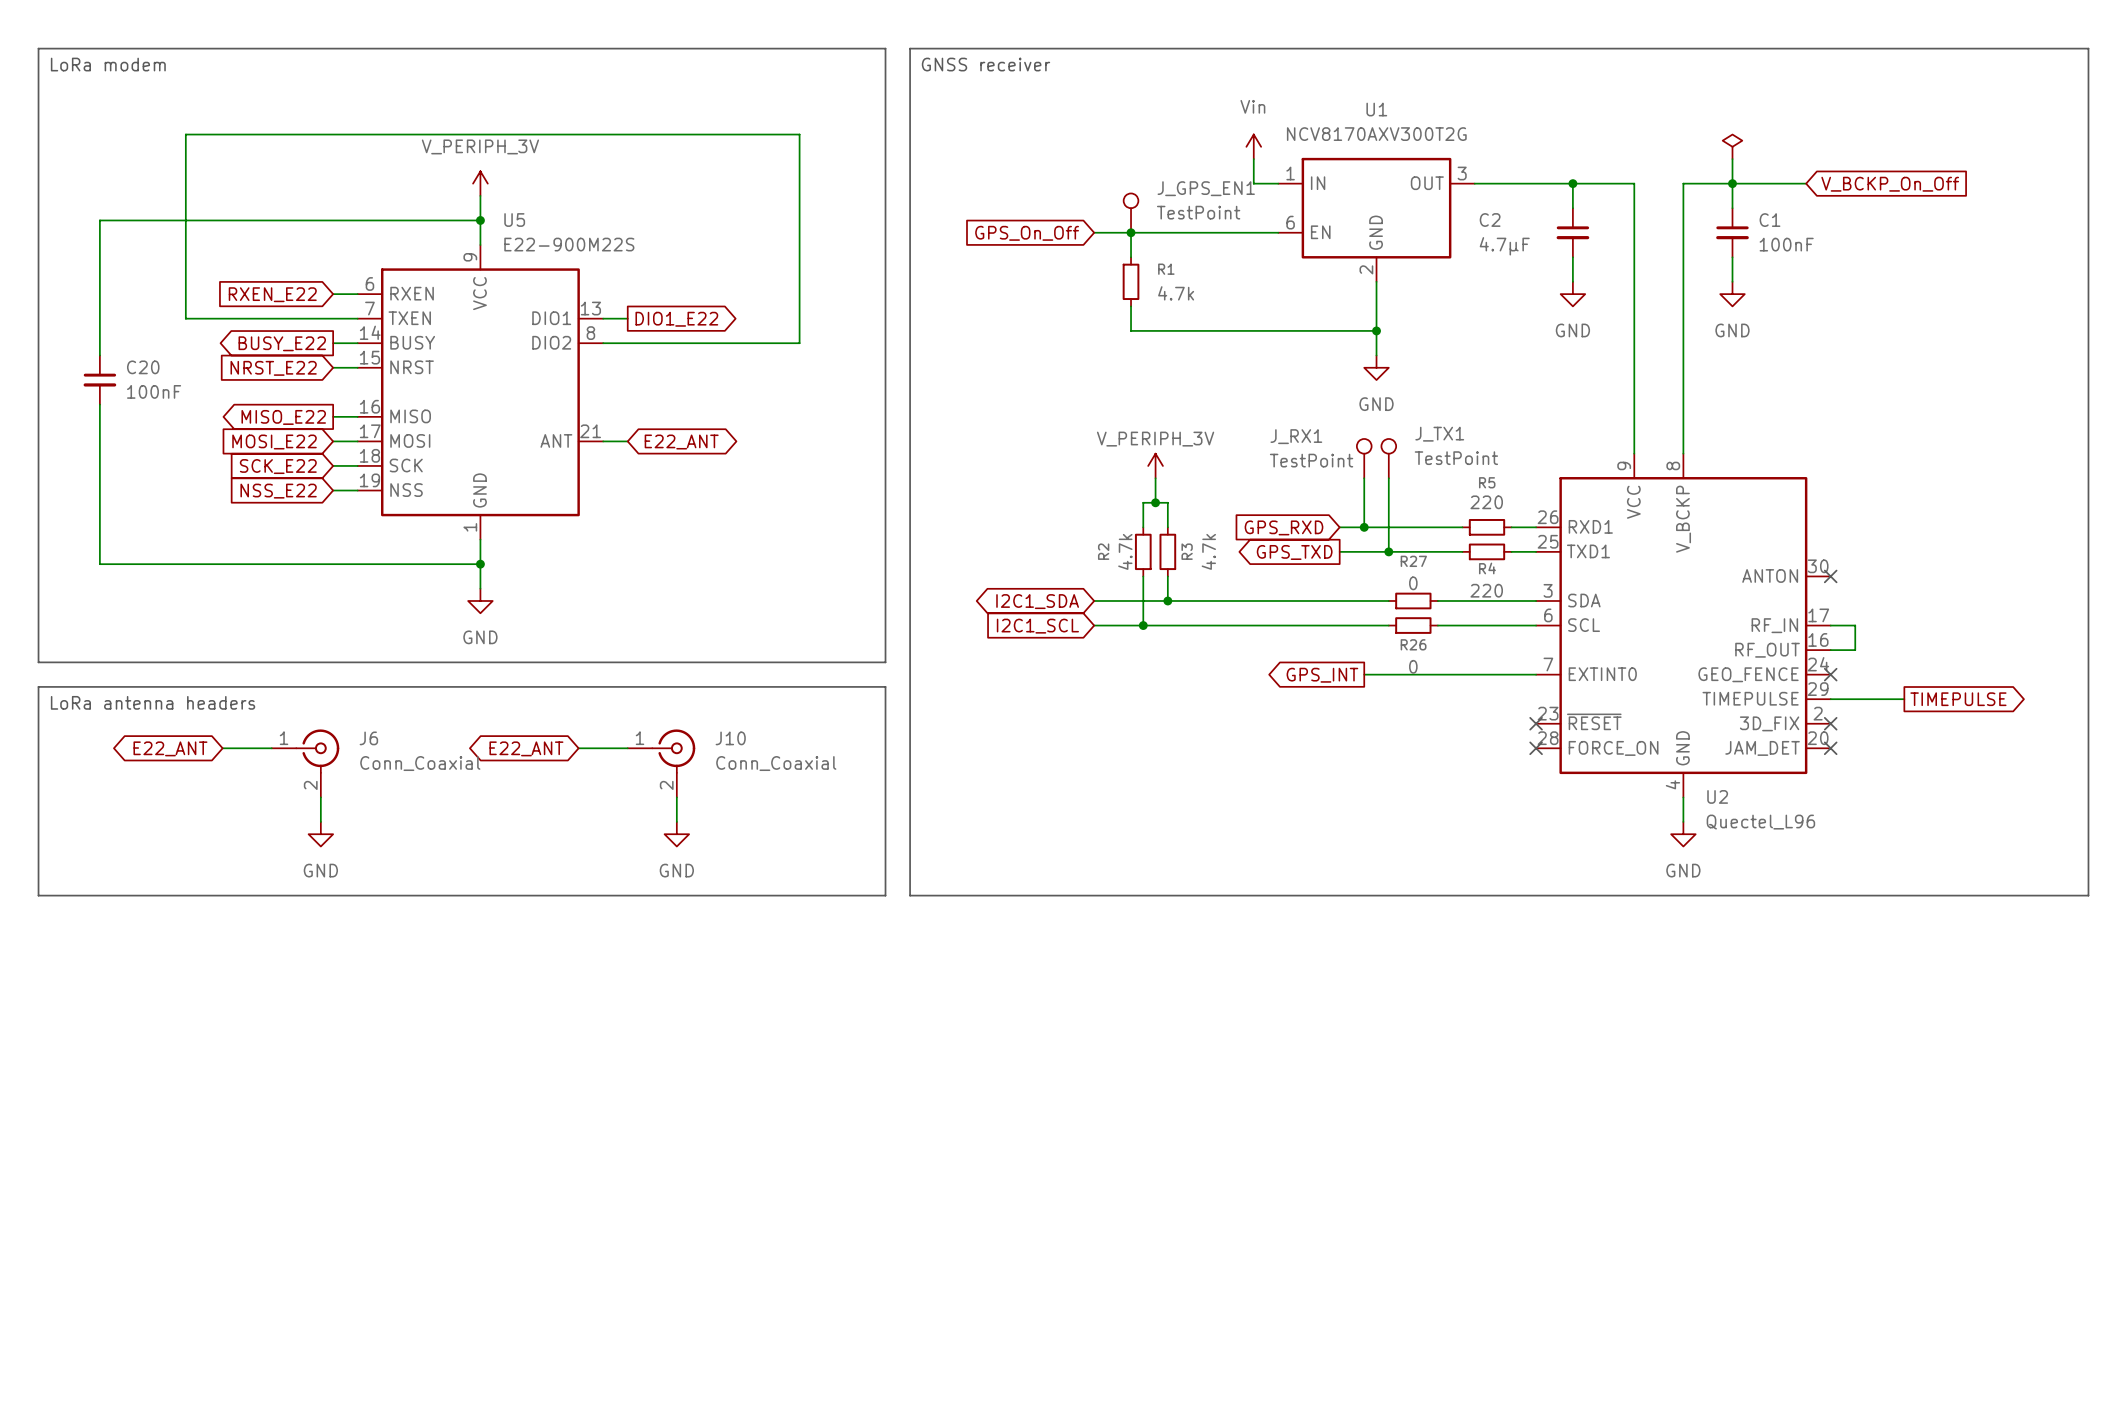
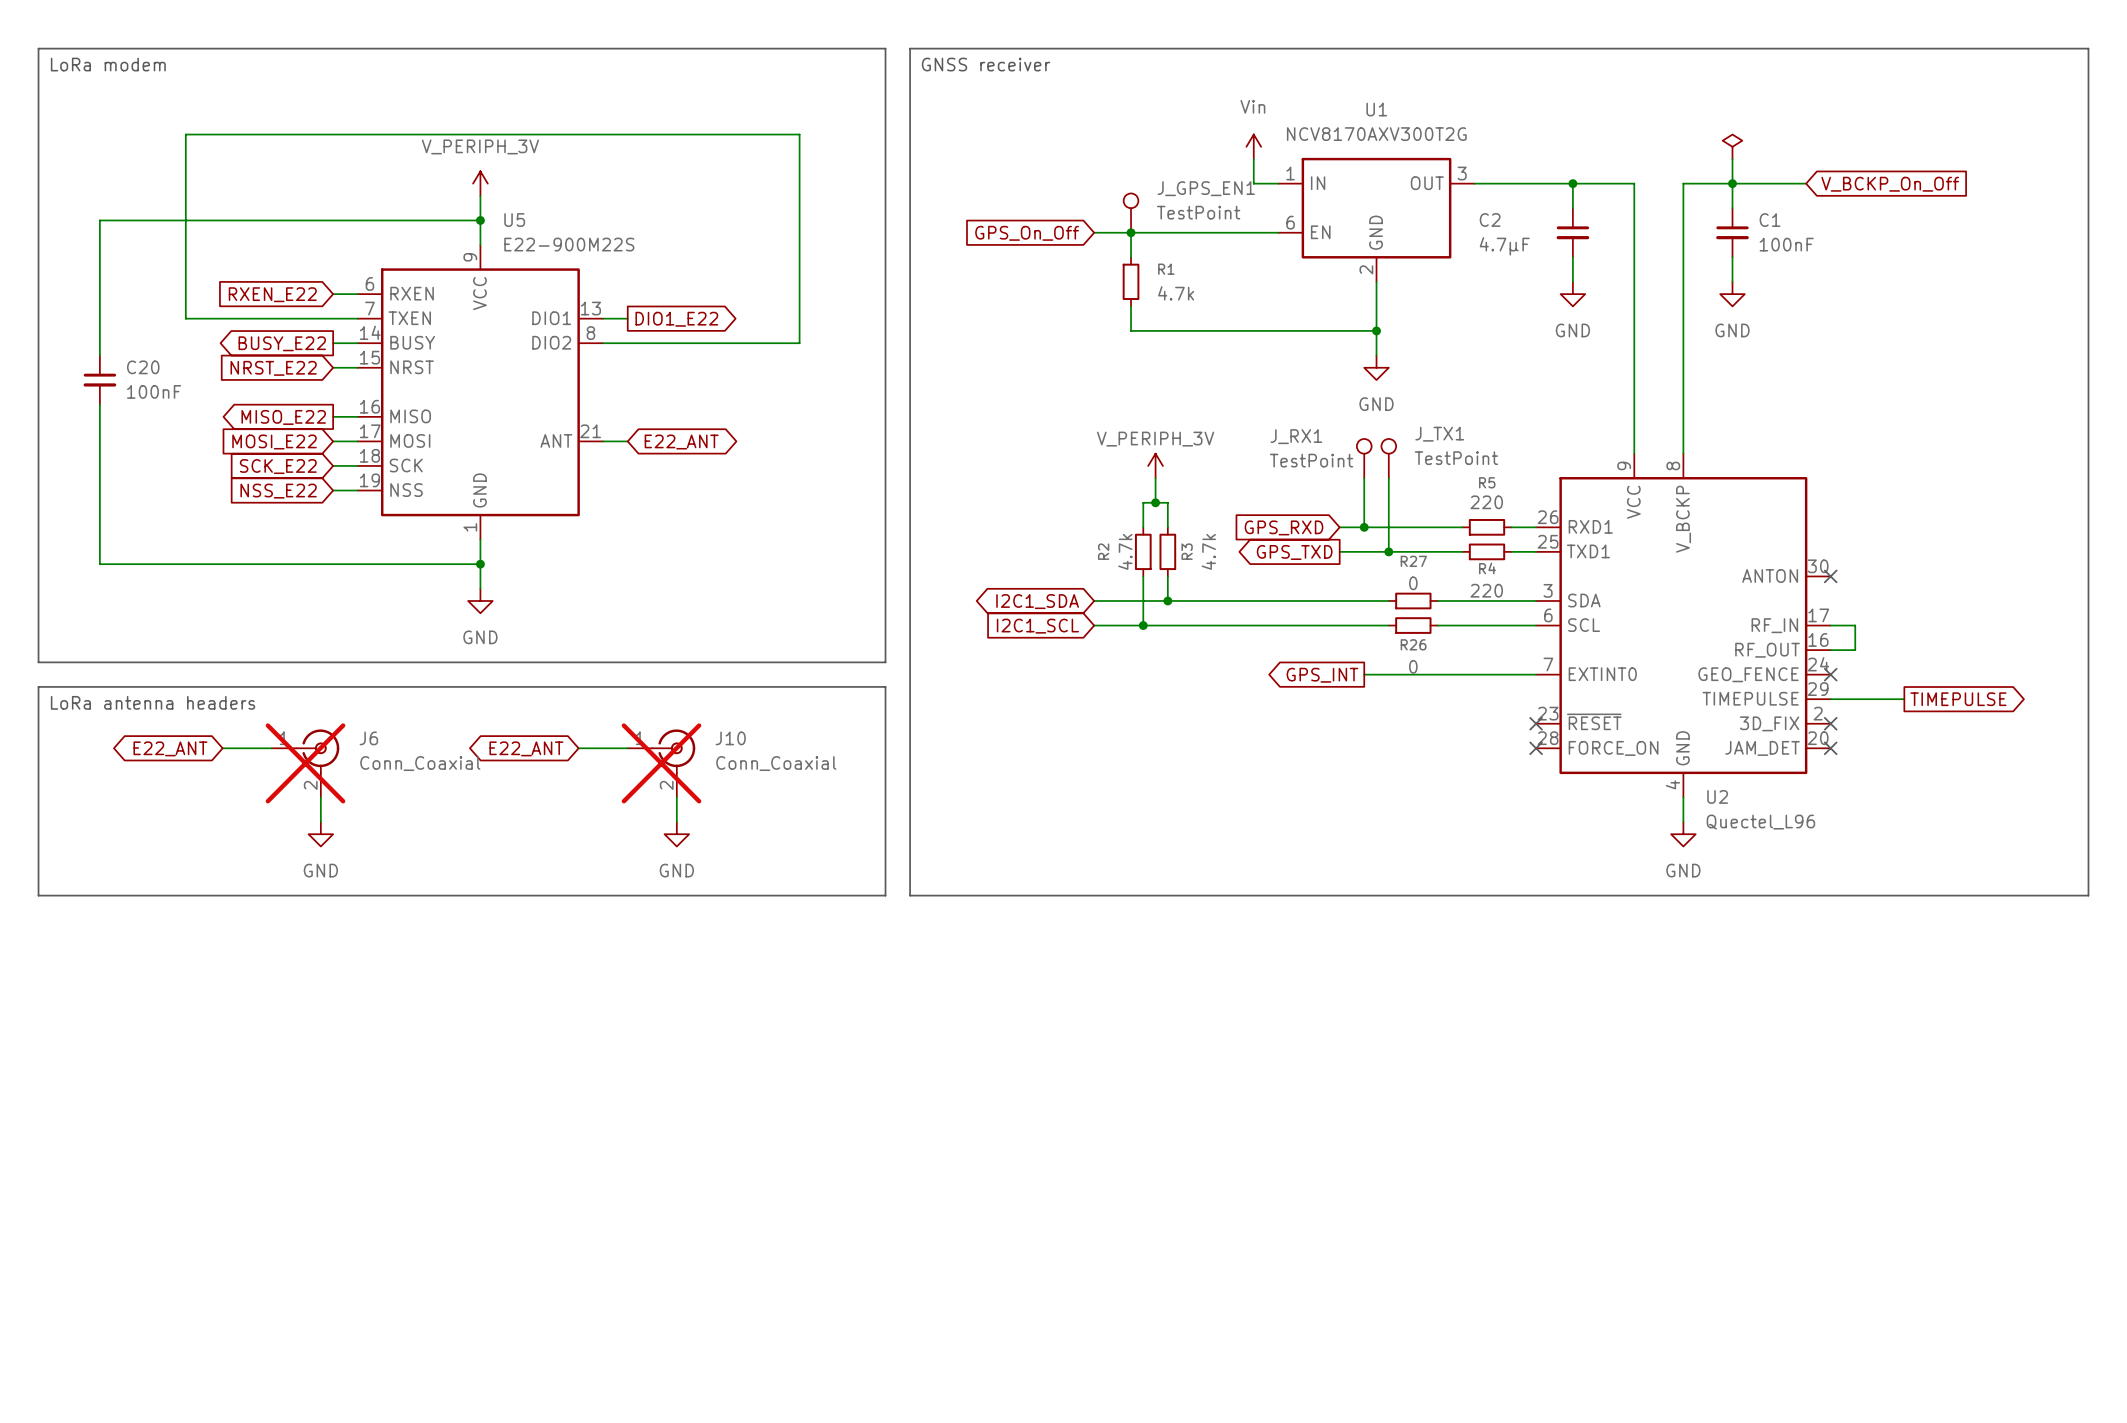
J6 do-not-place cross: none -> (305, 763)
J10 do-not-place cross: none -> (661, 763)

